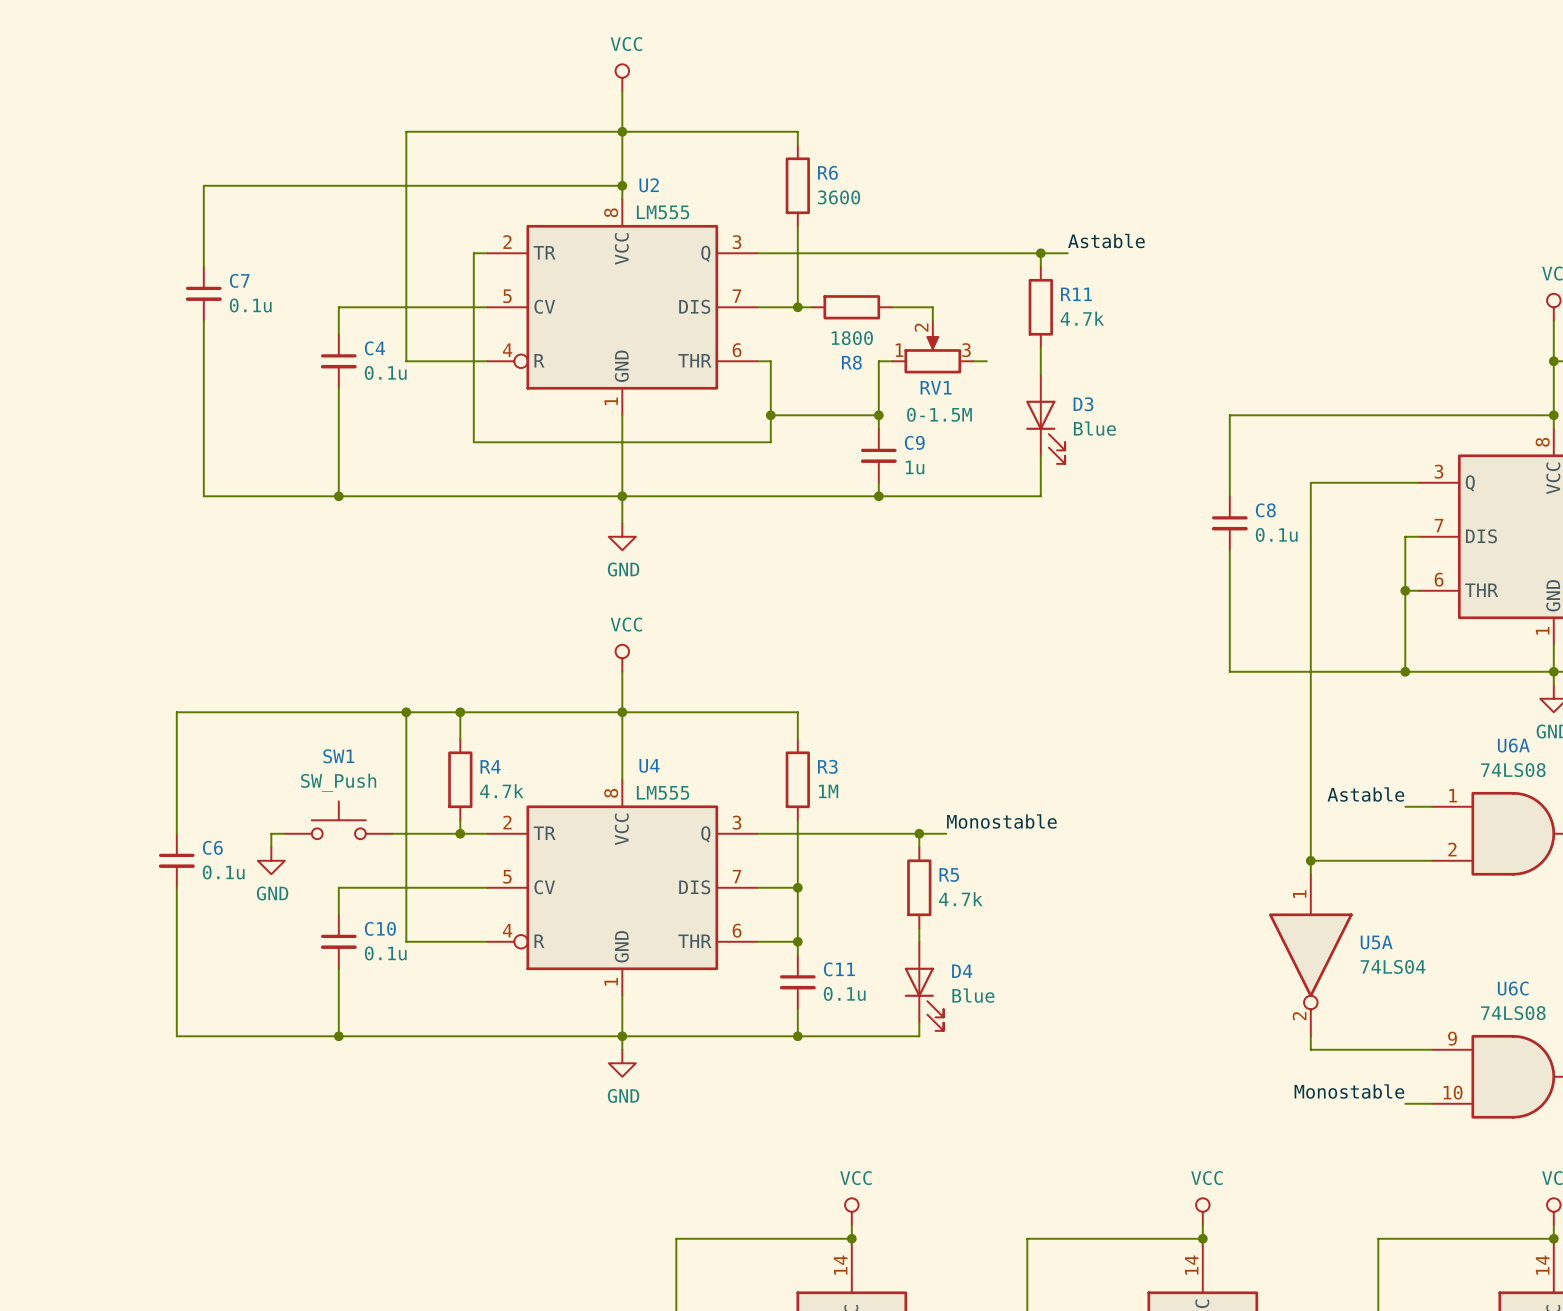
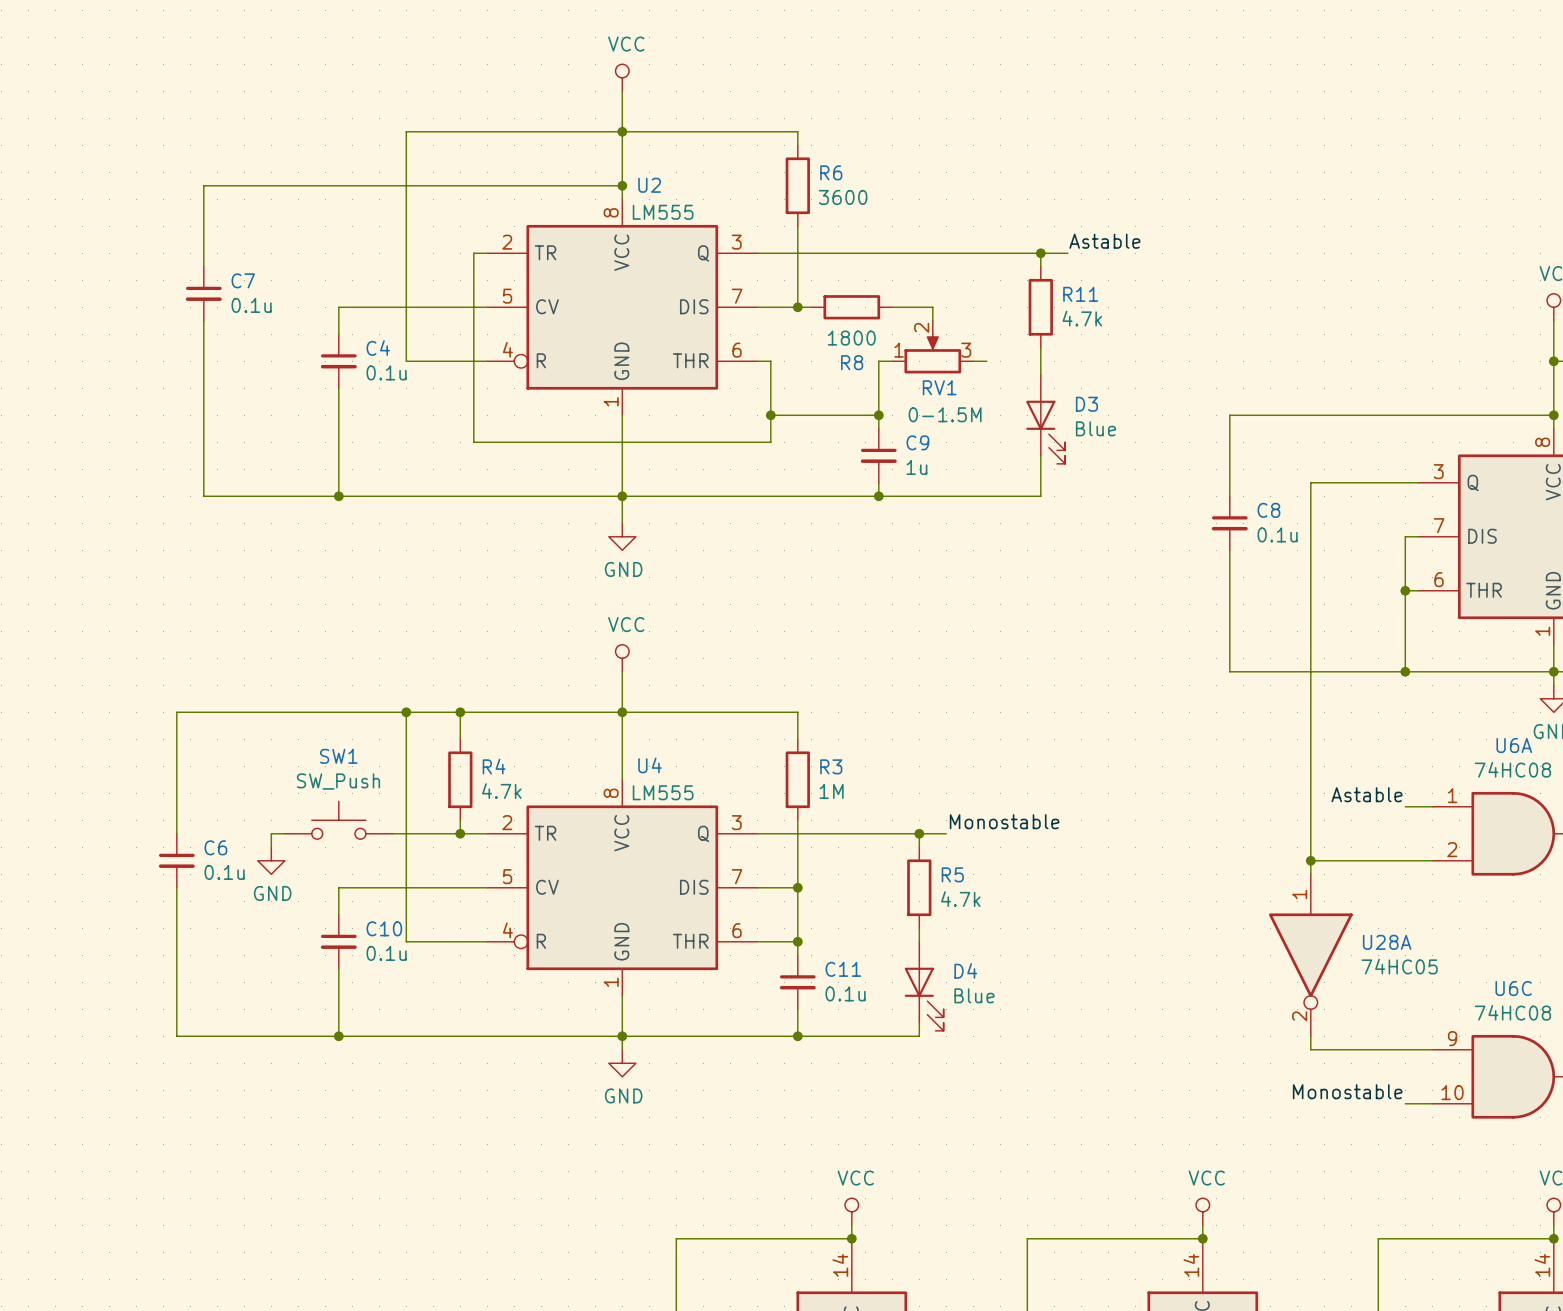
U6A value: 74LS08 (1513, 770) -> 74HC08 (1512, 769)
U5A name: U5A (1376, 942) -> U28A (1387, 942)
U5A value: 74LS04 (1393, 966) -> 74HC05 (1399, 966)
U6C value: 74LS08 (1513, 1013) -> 74HC08 (1512, 1012)

